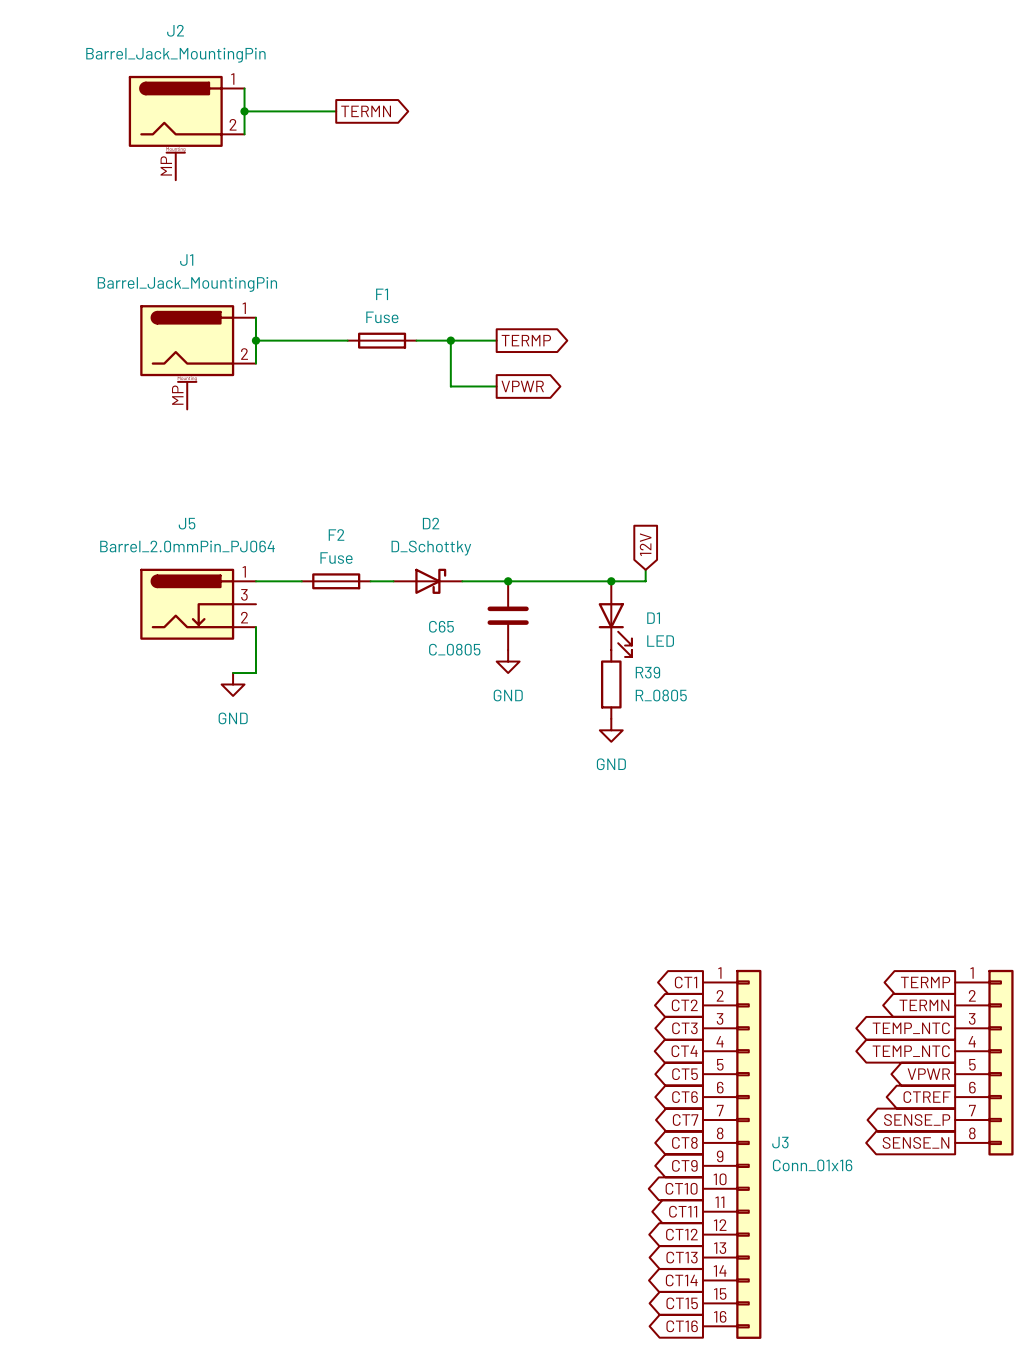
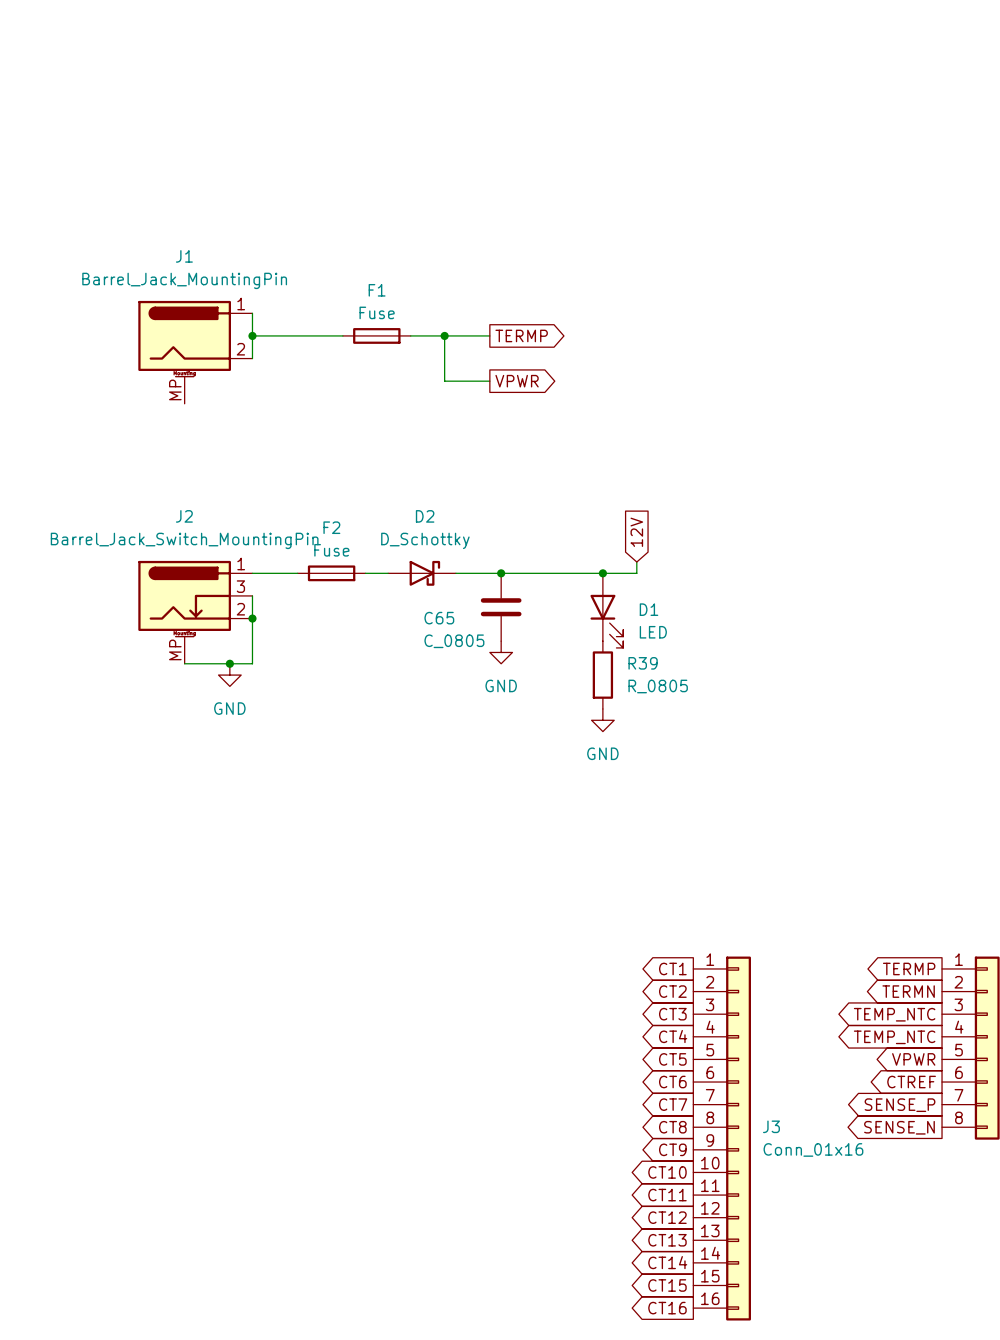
J2 value: Barrel_Jack_MountingPin (175, 55) -> Barrel_Jack_Switch_MountingPin (184, 540)
J2 symbol: [128, 75, 245, 181] -> [138, 560, 253, 664]
wire: (244, 88) (244, 134) -> none
wire: (244, 111) (336, 111) -> none
junction: (244, 111) -> none
global label: TERMN (366, 111) -> none
J5: Barrel_2.0mmPin_PJ064 (198, 604) -> none
wire: none -> (252, 595) (252, 618)
junction: none -> (252, 618)
wire: none -> (184, 663) (229, 663)
junction: none -> (229, 663)

